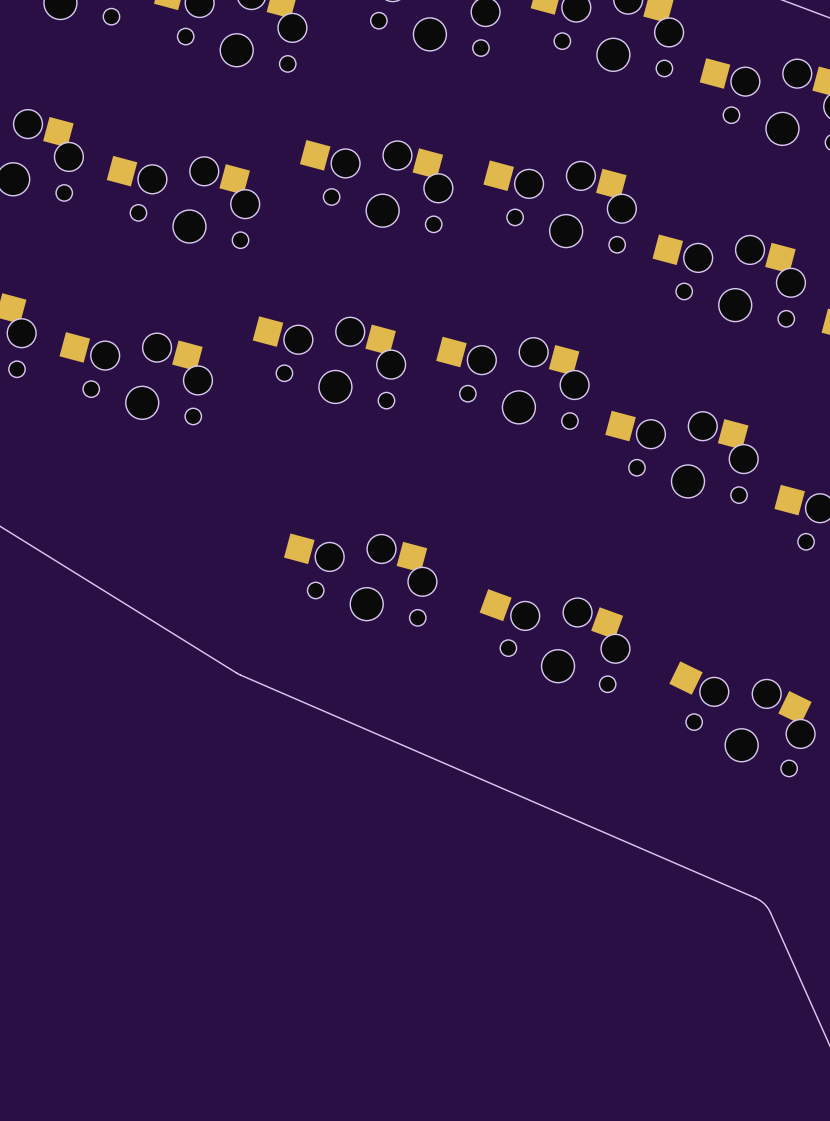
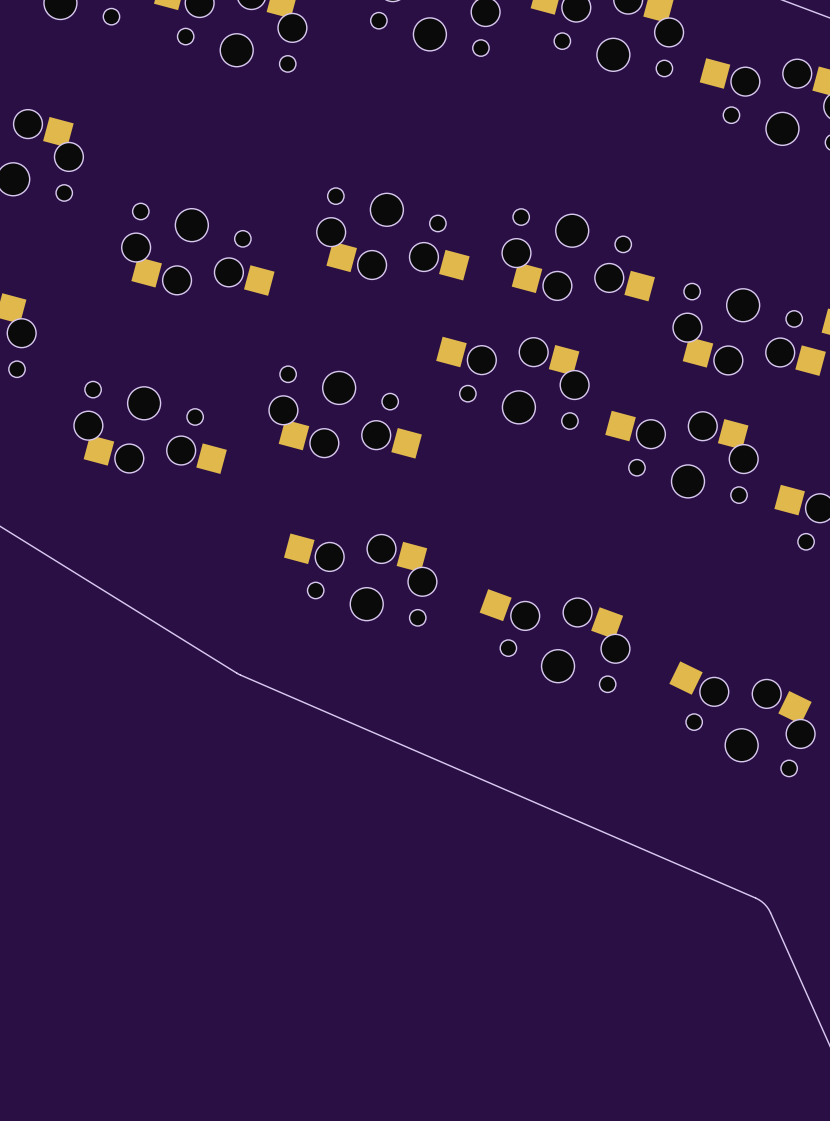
part rotation: 0° (376, 186) -> 180° (393, 234)
part rotation: 0° (183, 202) -> 180° (198, 249)
part rotation: 0° (559, 206) -> 180° (578, 255)
part rotation: 0° (728, 280) -> 180° (749, 329)
part rotation: 0° (329, 362) -> 180° (345, 412)
part rotation: 0° (135, 378) -> 180° (150, 427)

